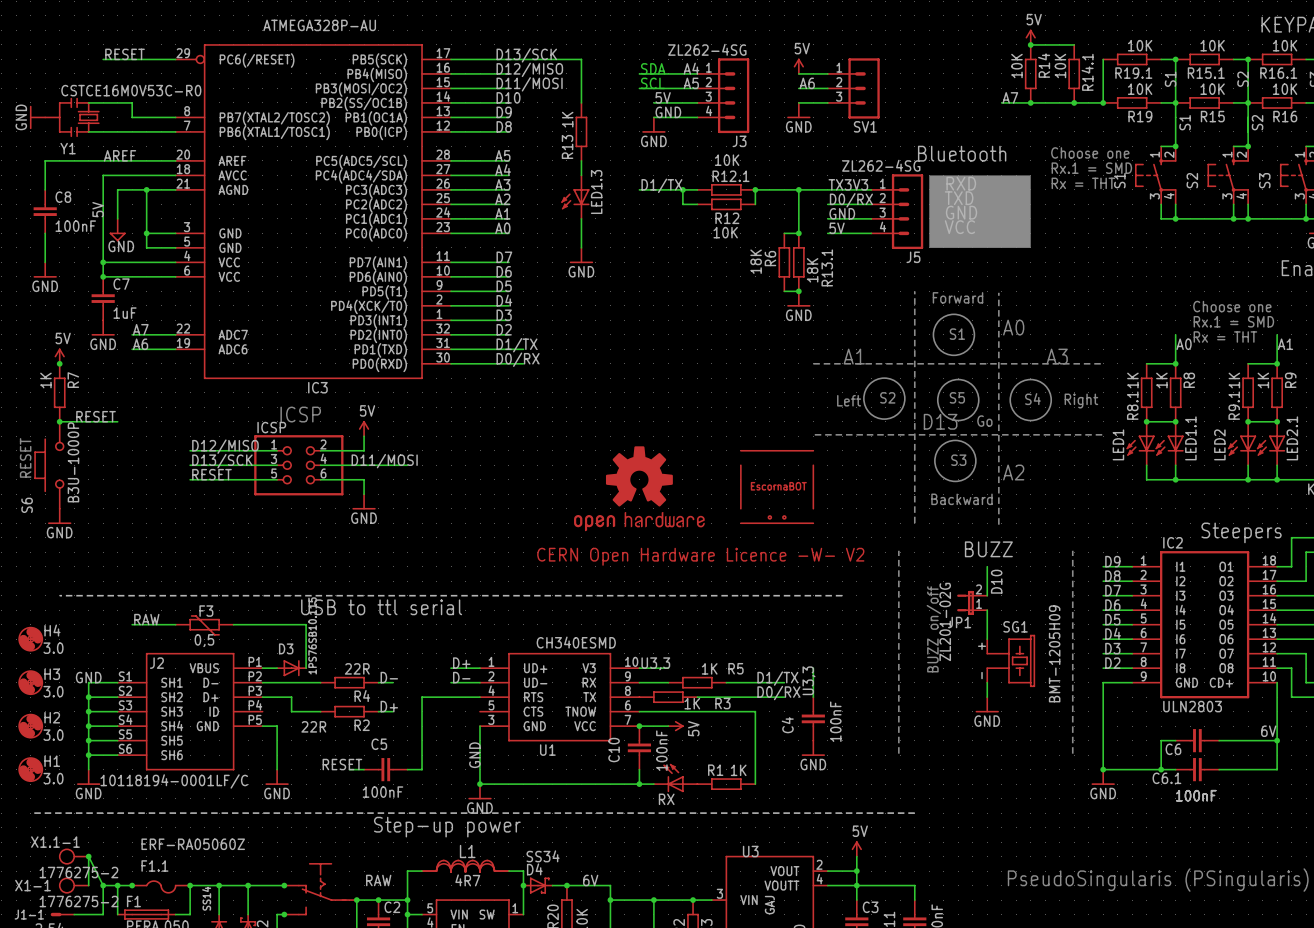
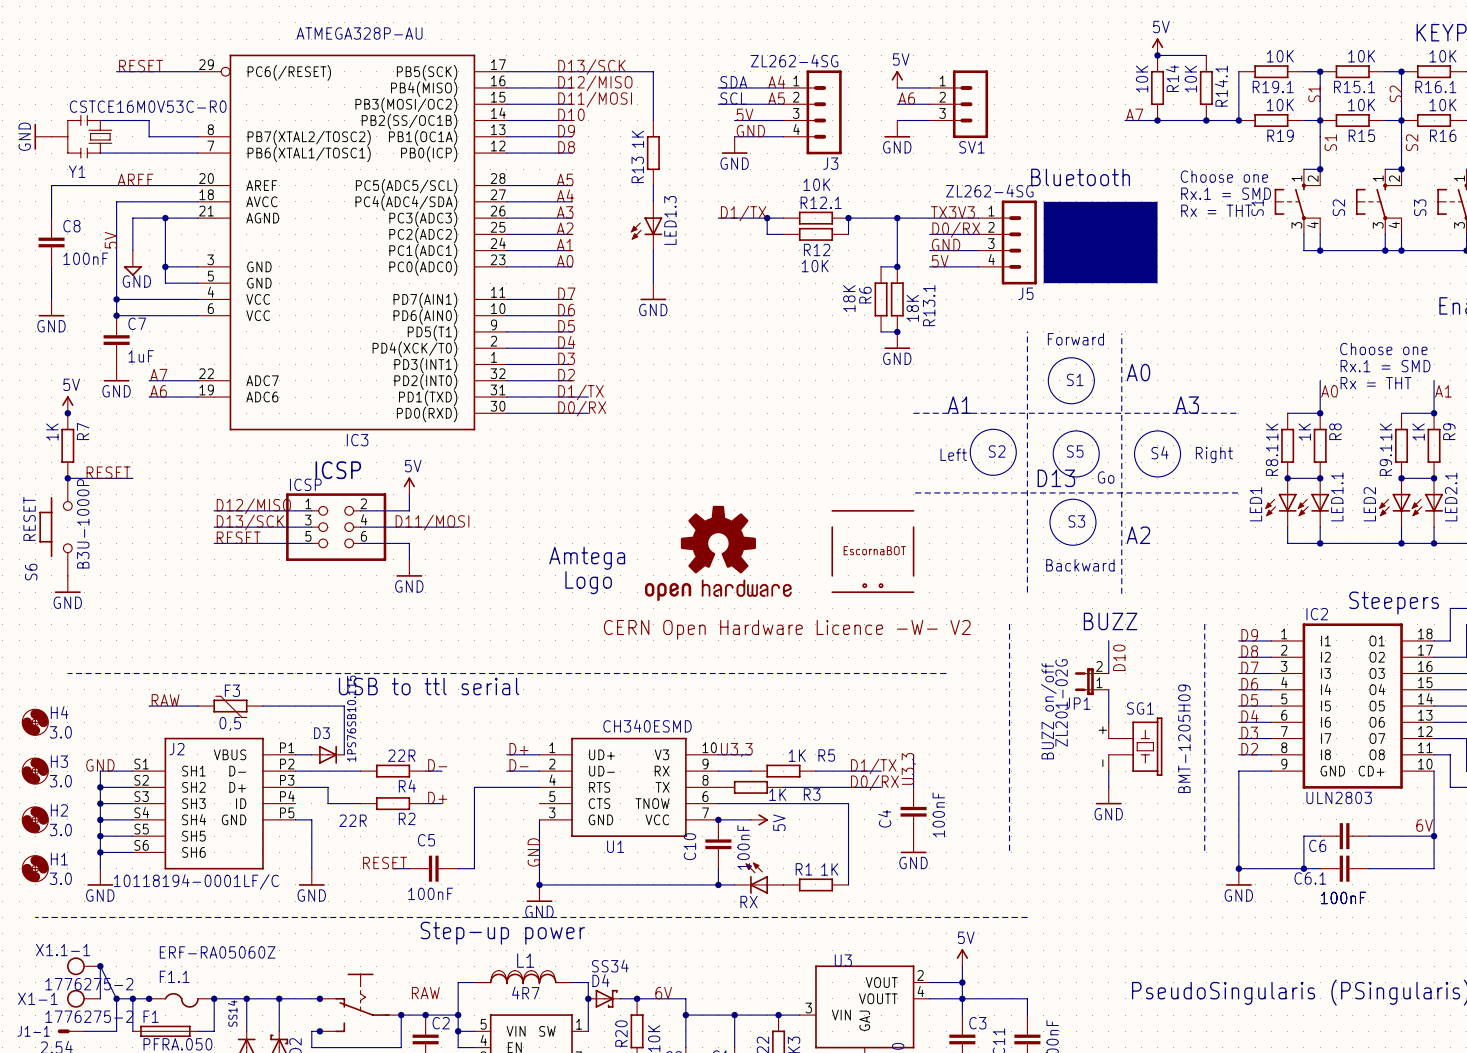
text: none -> Amtega (587, 558)
text: none -> Logo (588, 582)

